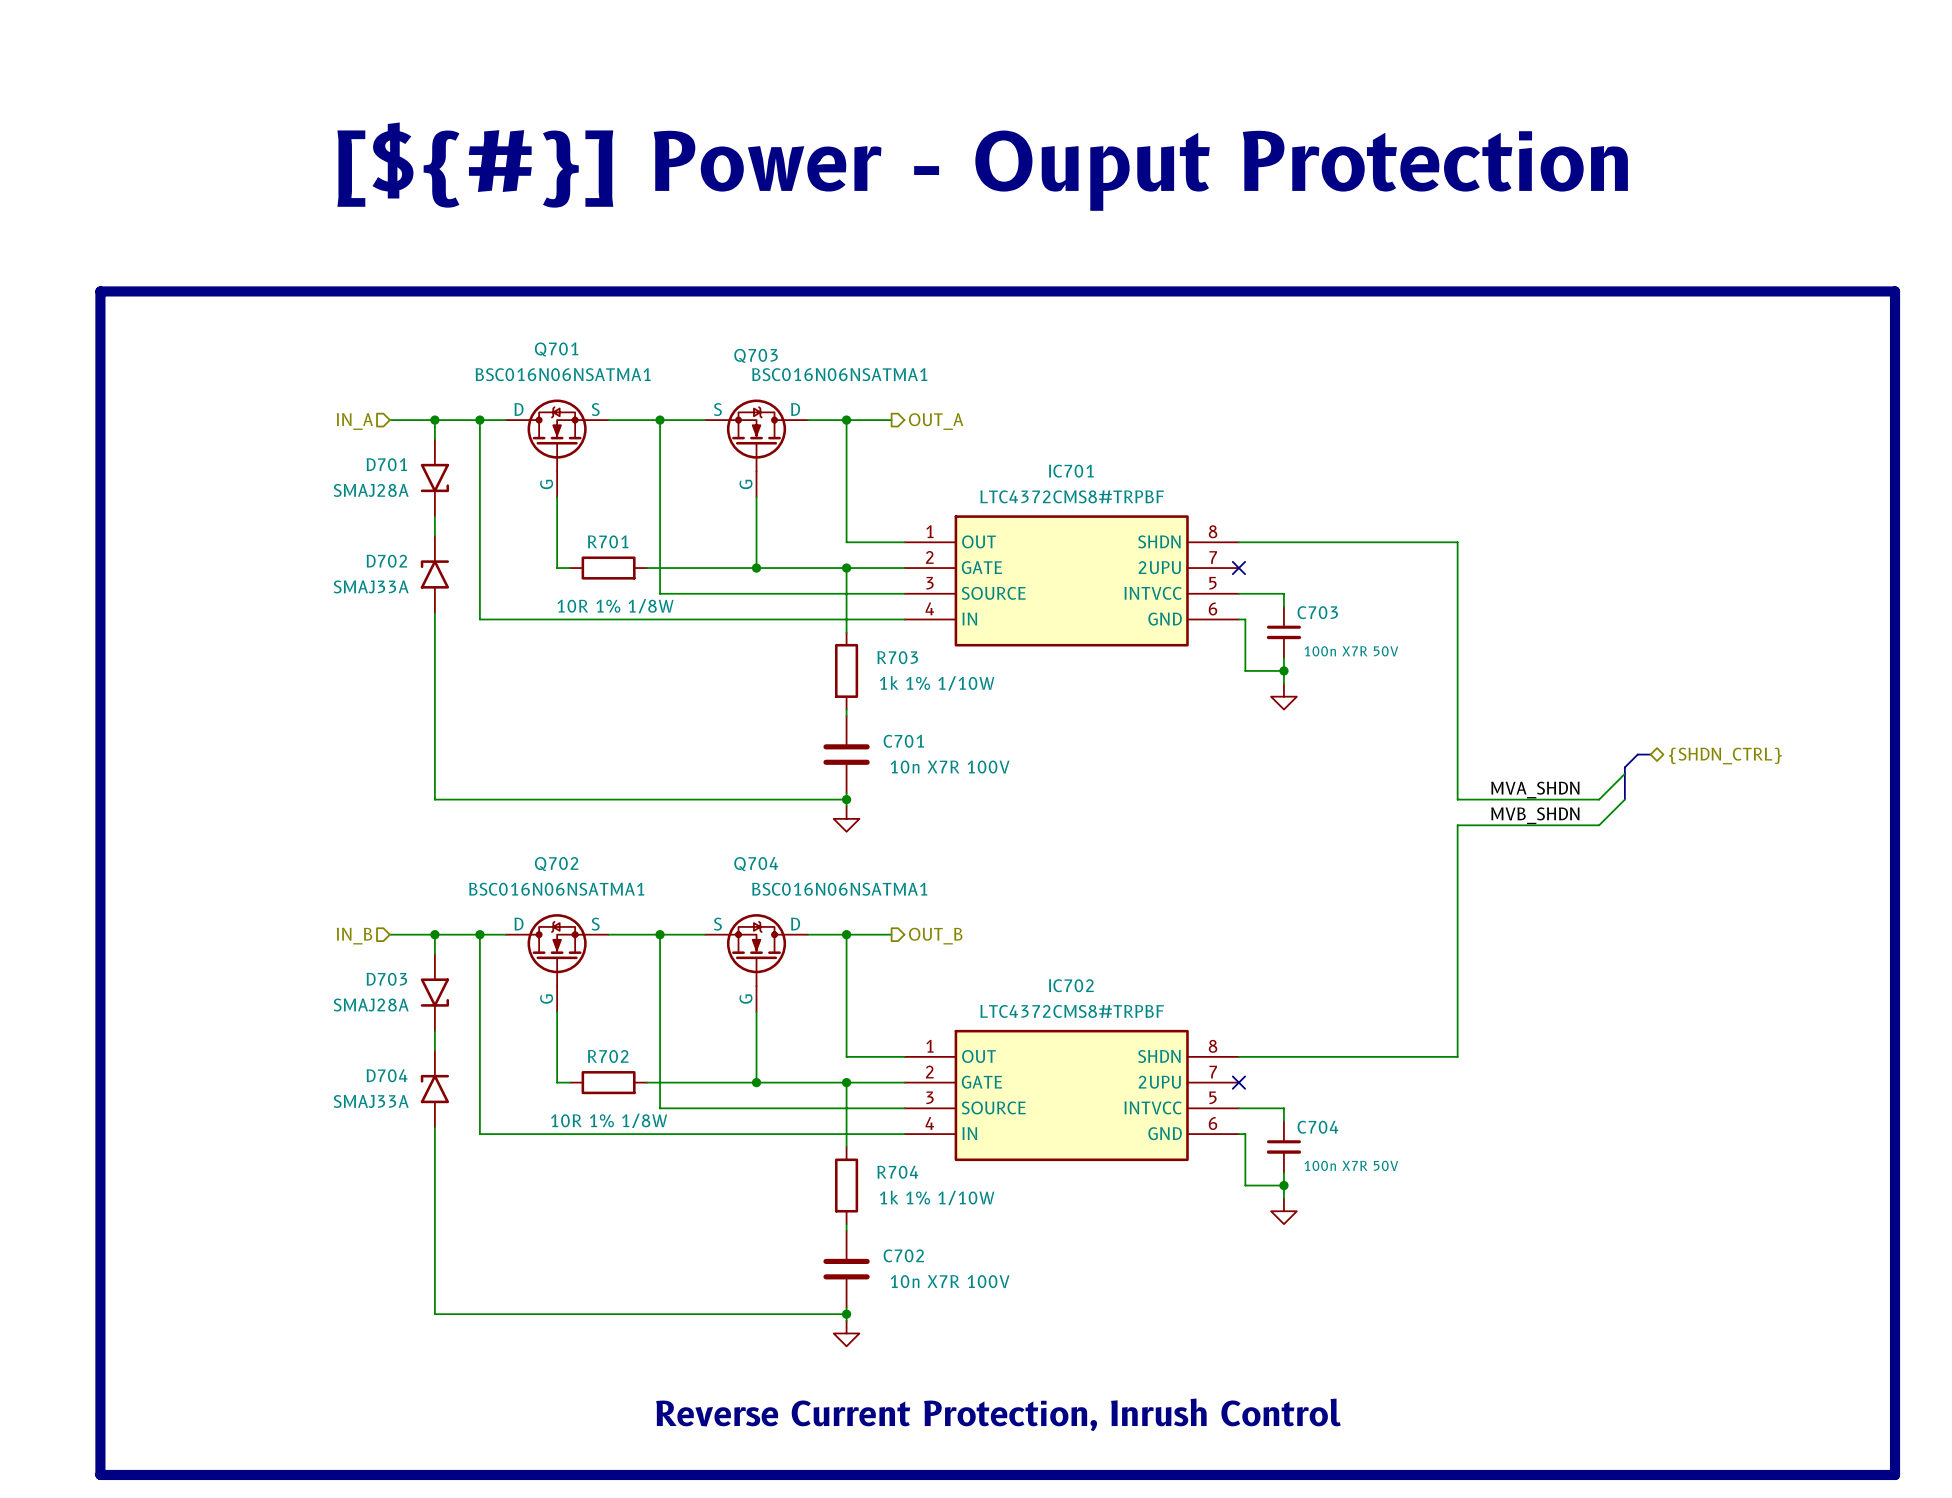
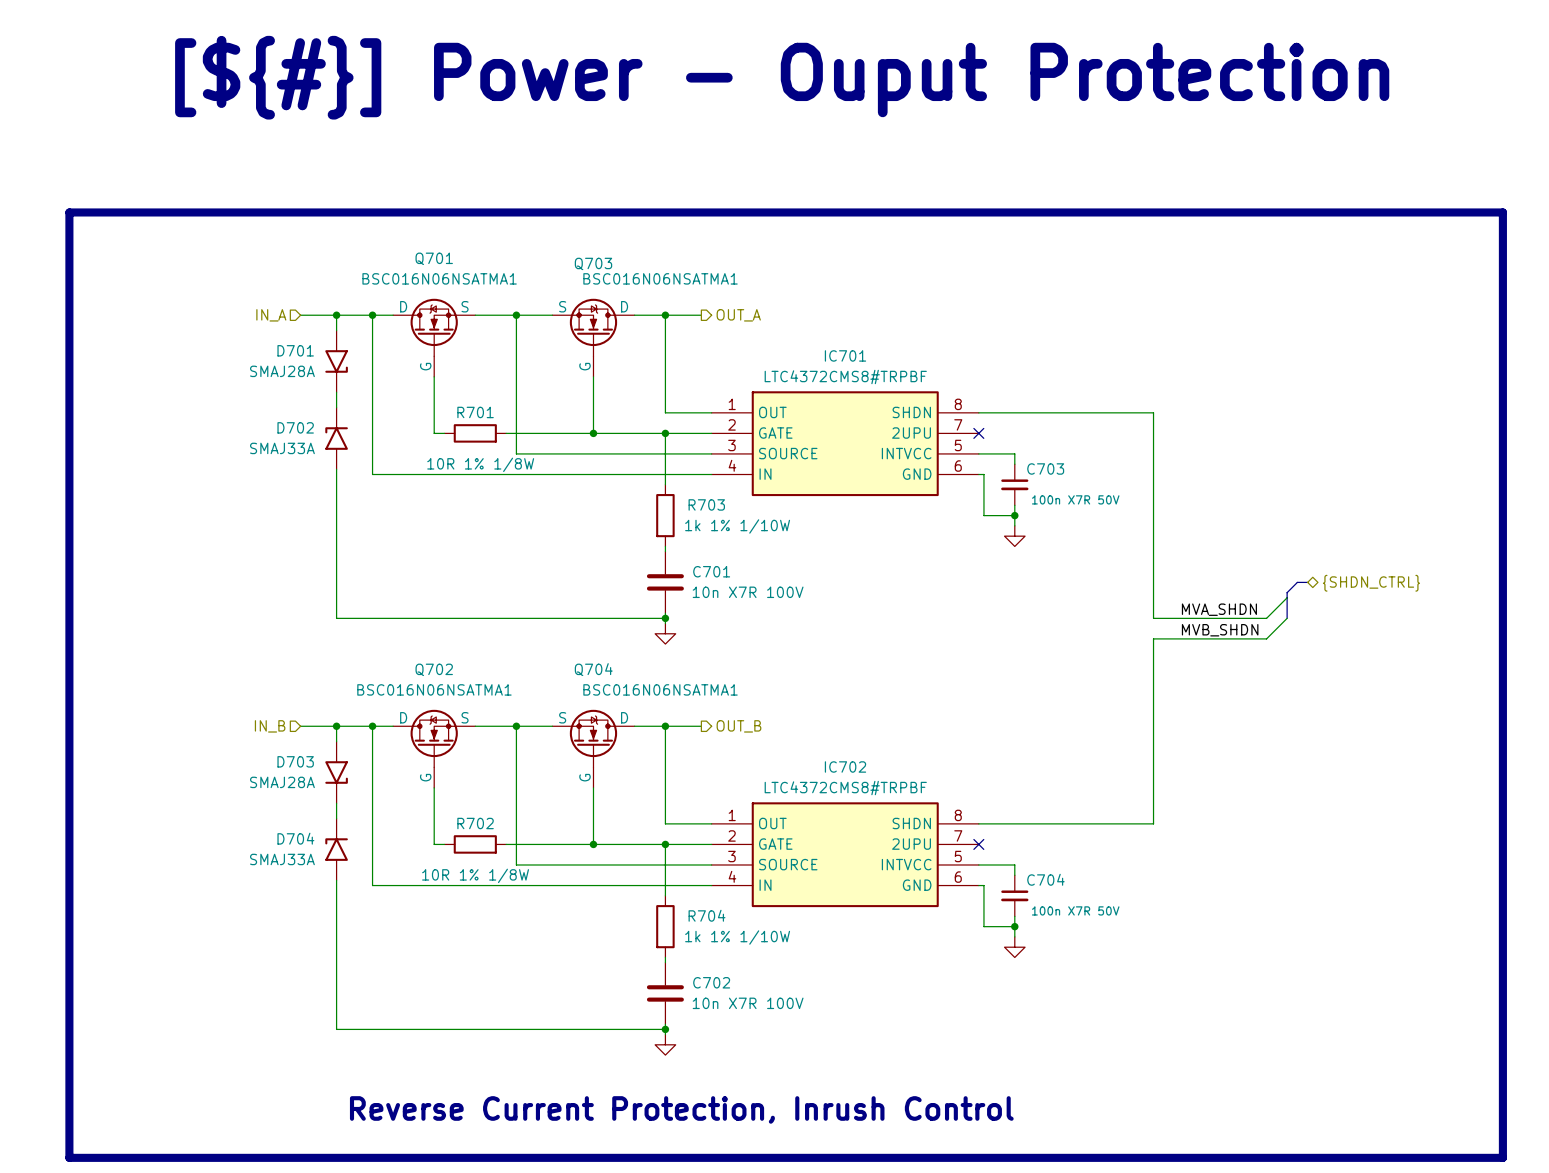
text position: [${#}] Power - Ouput Protection (982, 166) -> [${#}] Power - Ouput Protection (782, 77)
text position: Reverse Current Protection, Inrush Control (998, 1414) -> Reverse Current Protection, Inrush Control (681, 1109)

